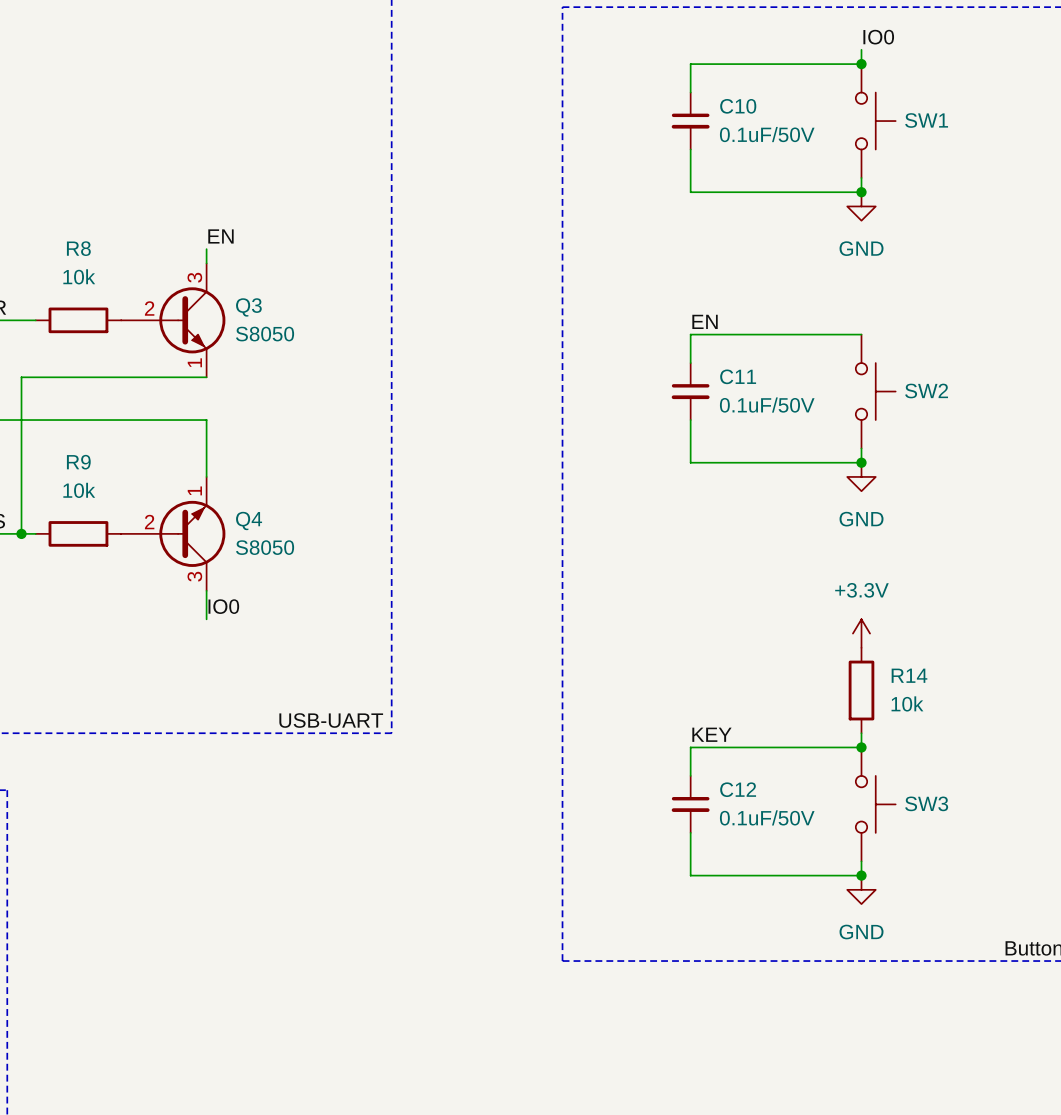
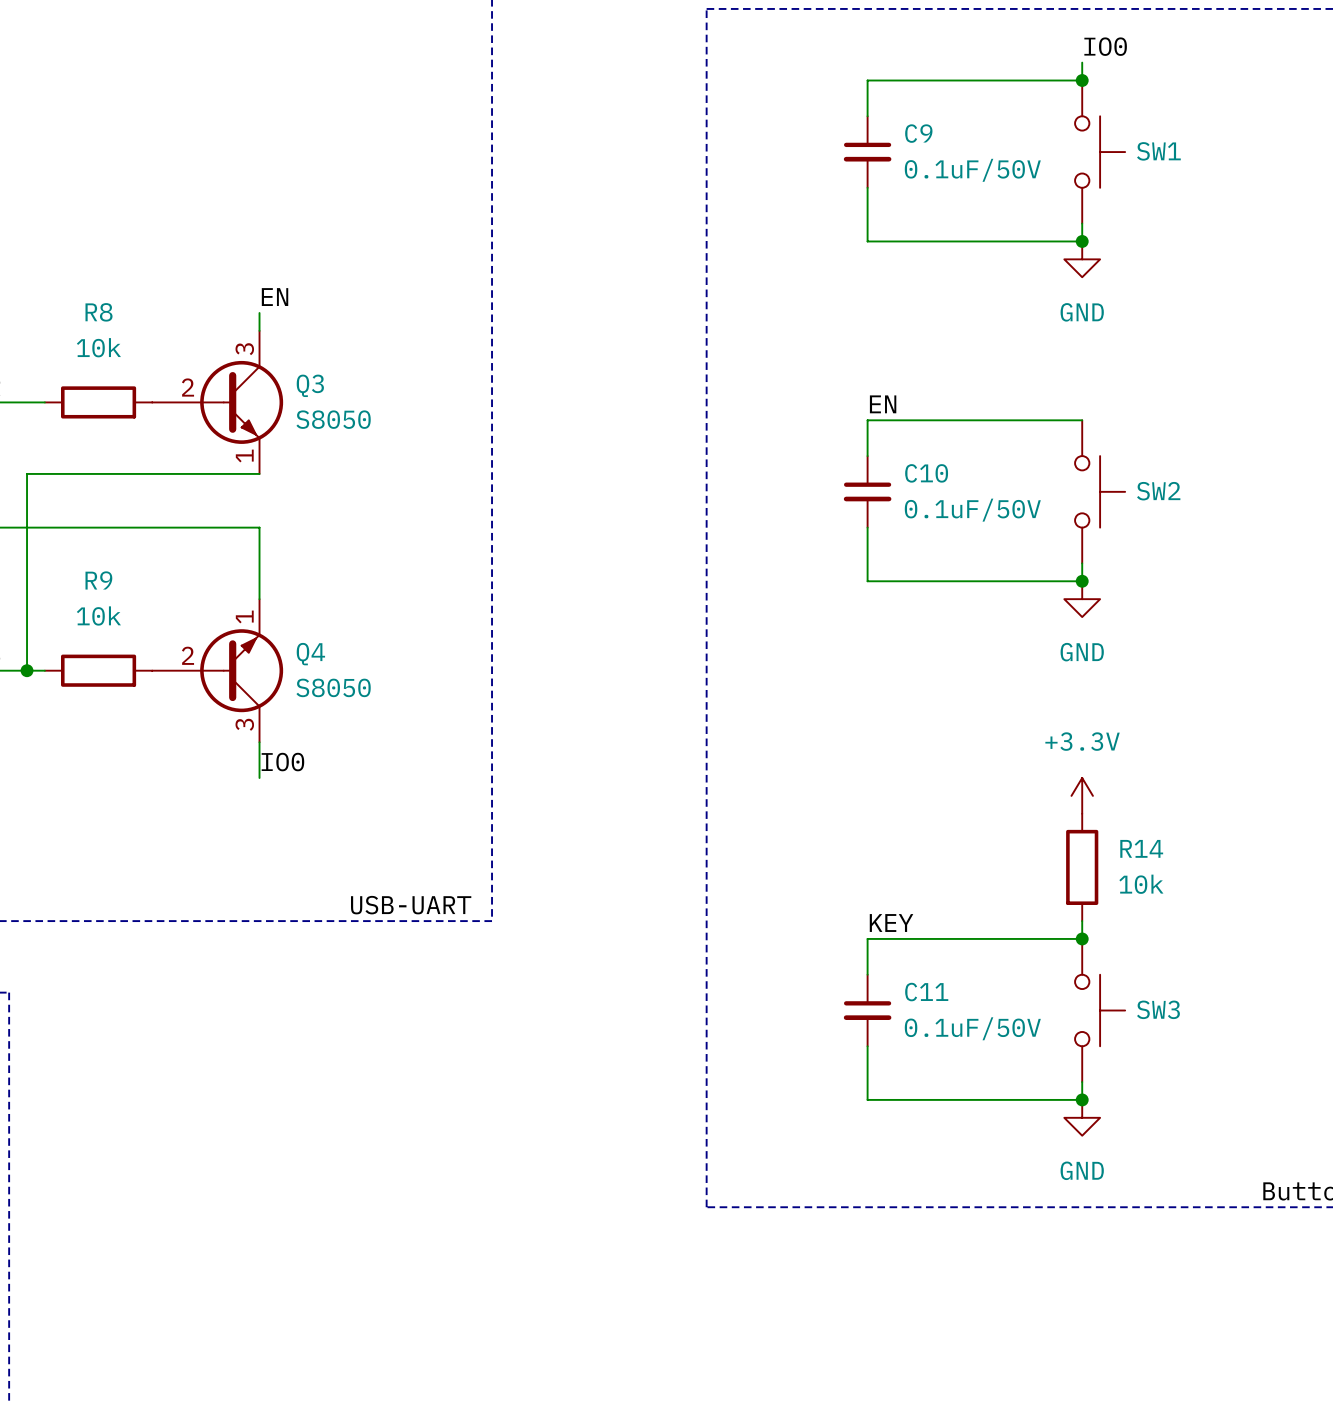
C10 name: C10 (738, 106) -> C9 (918, 133)
C11 name: C11 (738, 376) -> C10 (926, 473)
C12 name: C12 (738, 789) -> C11 (926, 992)

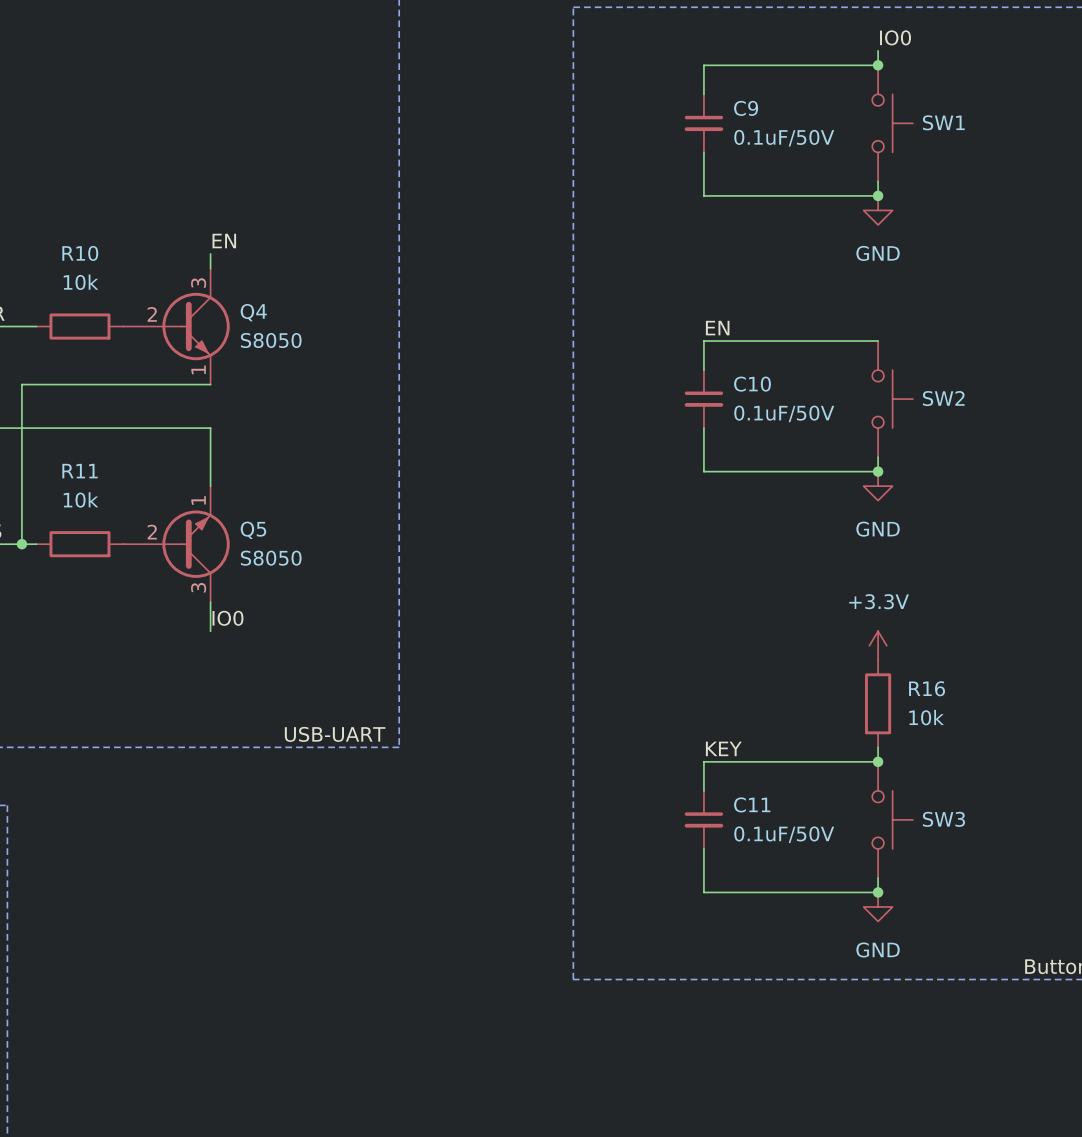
R8 name: R8 (99, 312) -> R10 (80, 253)
Q3 name: Q3 (310, 385) -> Q4 (253, 312)
R9 name: R9 (98, 580) -> R11 (80, 471)
Q4 name: Q4 (310, 654) -> Q5 (253, 530)
R14 name: R14 (1141, 848) -> R16 (927, 688)

